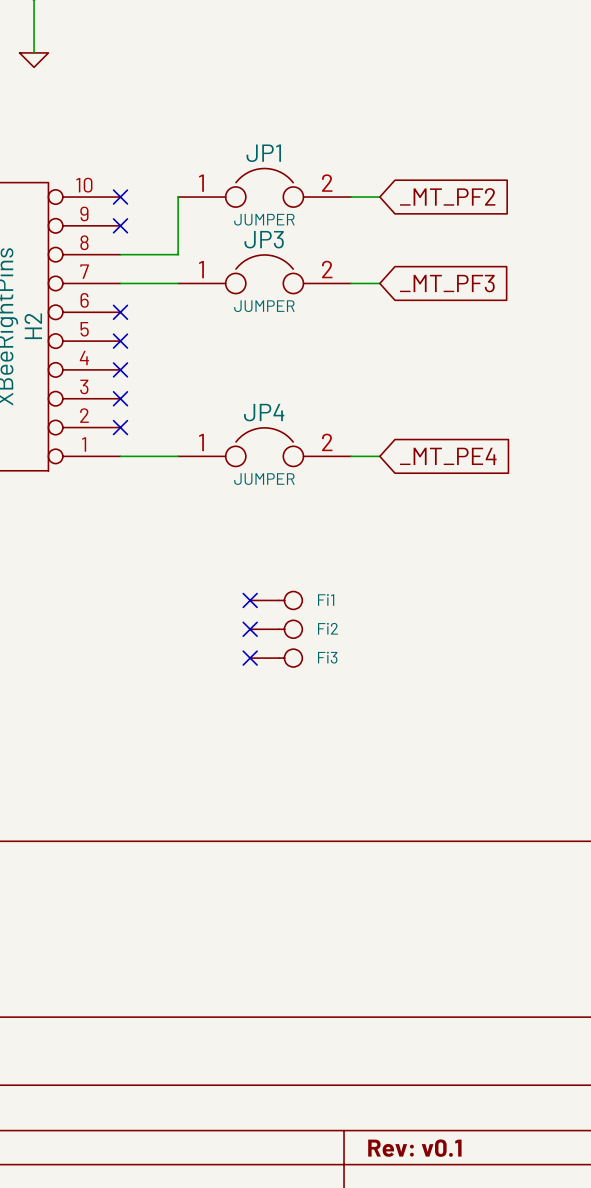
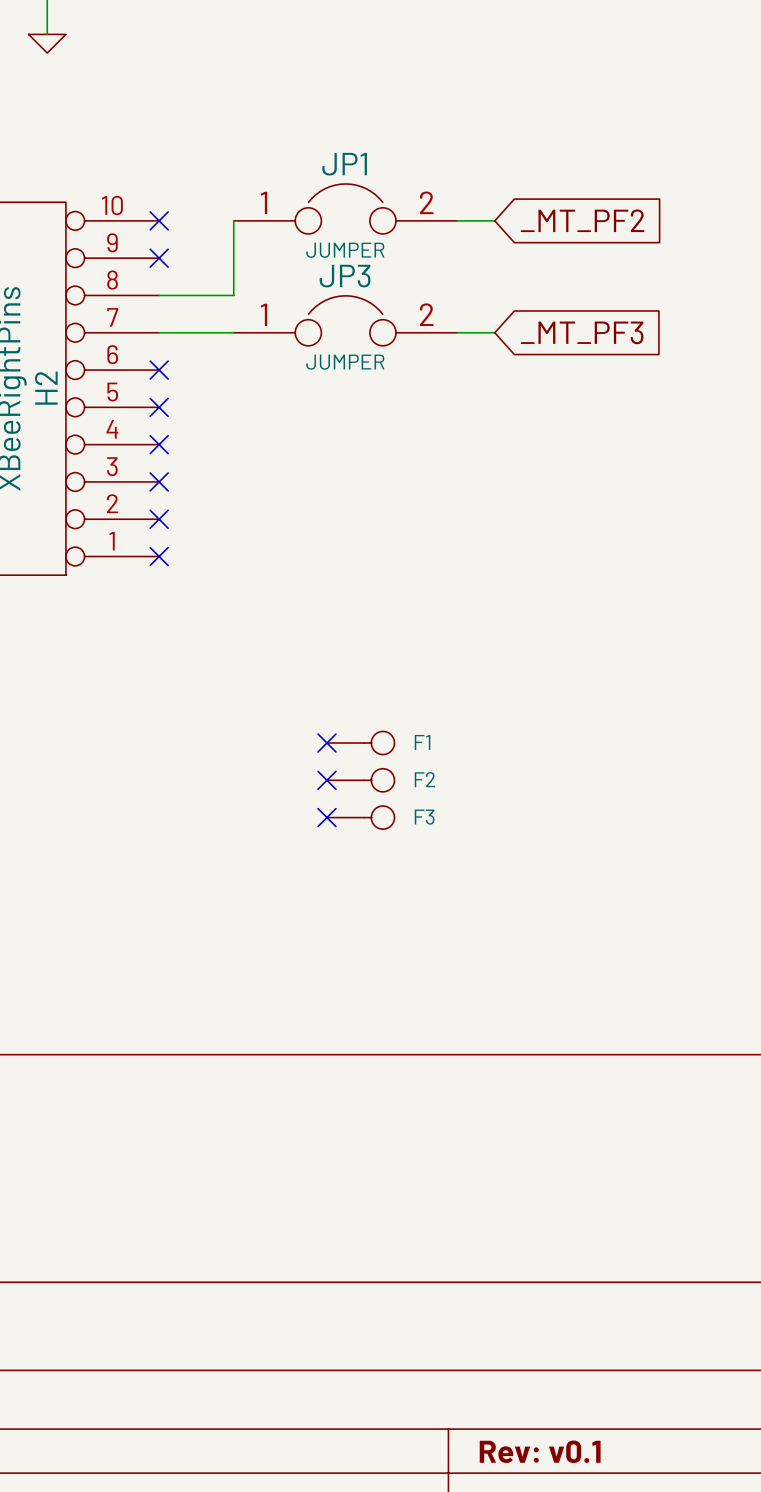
JP4: JUMPER (264, 447) -> none
wire: (120, 456) (178, 456) -> none
no-connect mark: none -> (159, 556)
wire: (351, 456) (379, 456) -> none
global label: _MT_PE4 (448, 456) -> none
Fi1 name: Fi1 (326, 599) -> F1 (422, 742)
Fi2 name: Fi2 (327, 628) -> F2 (424, 779)
Fi3 name: Fi3 (327, 657) -> F3 (424, 817)

